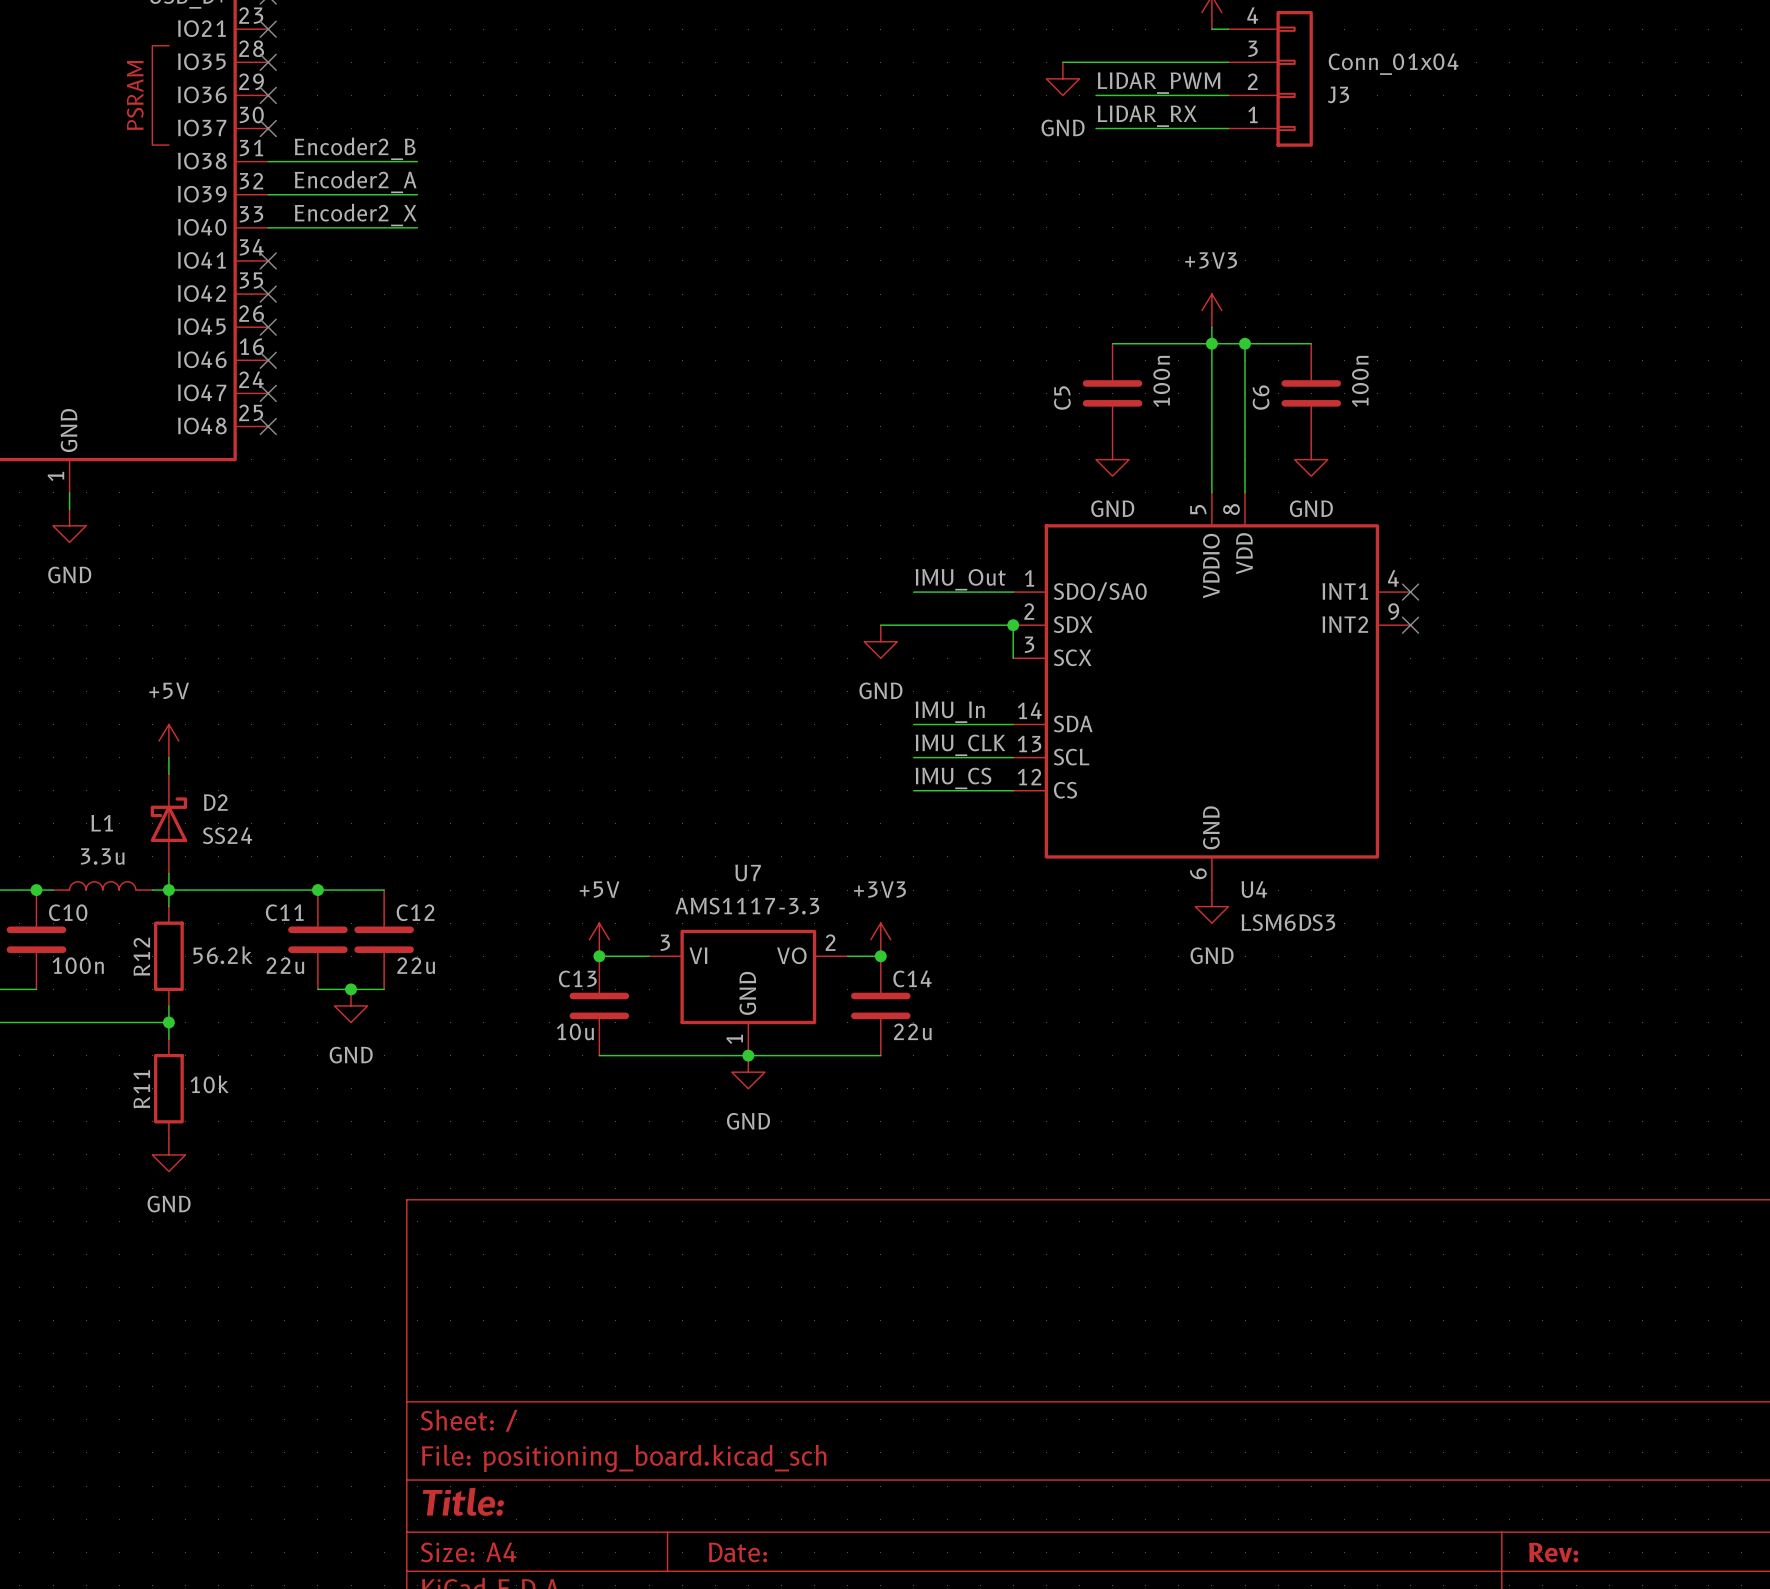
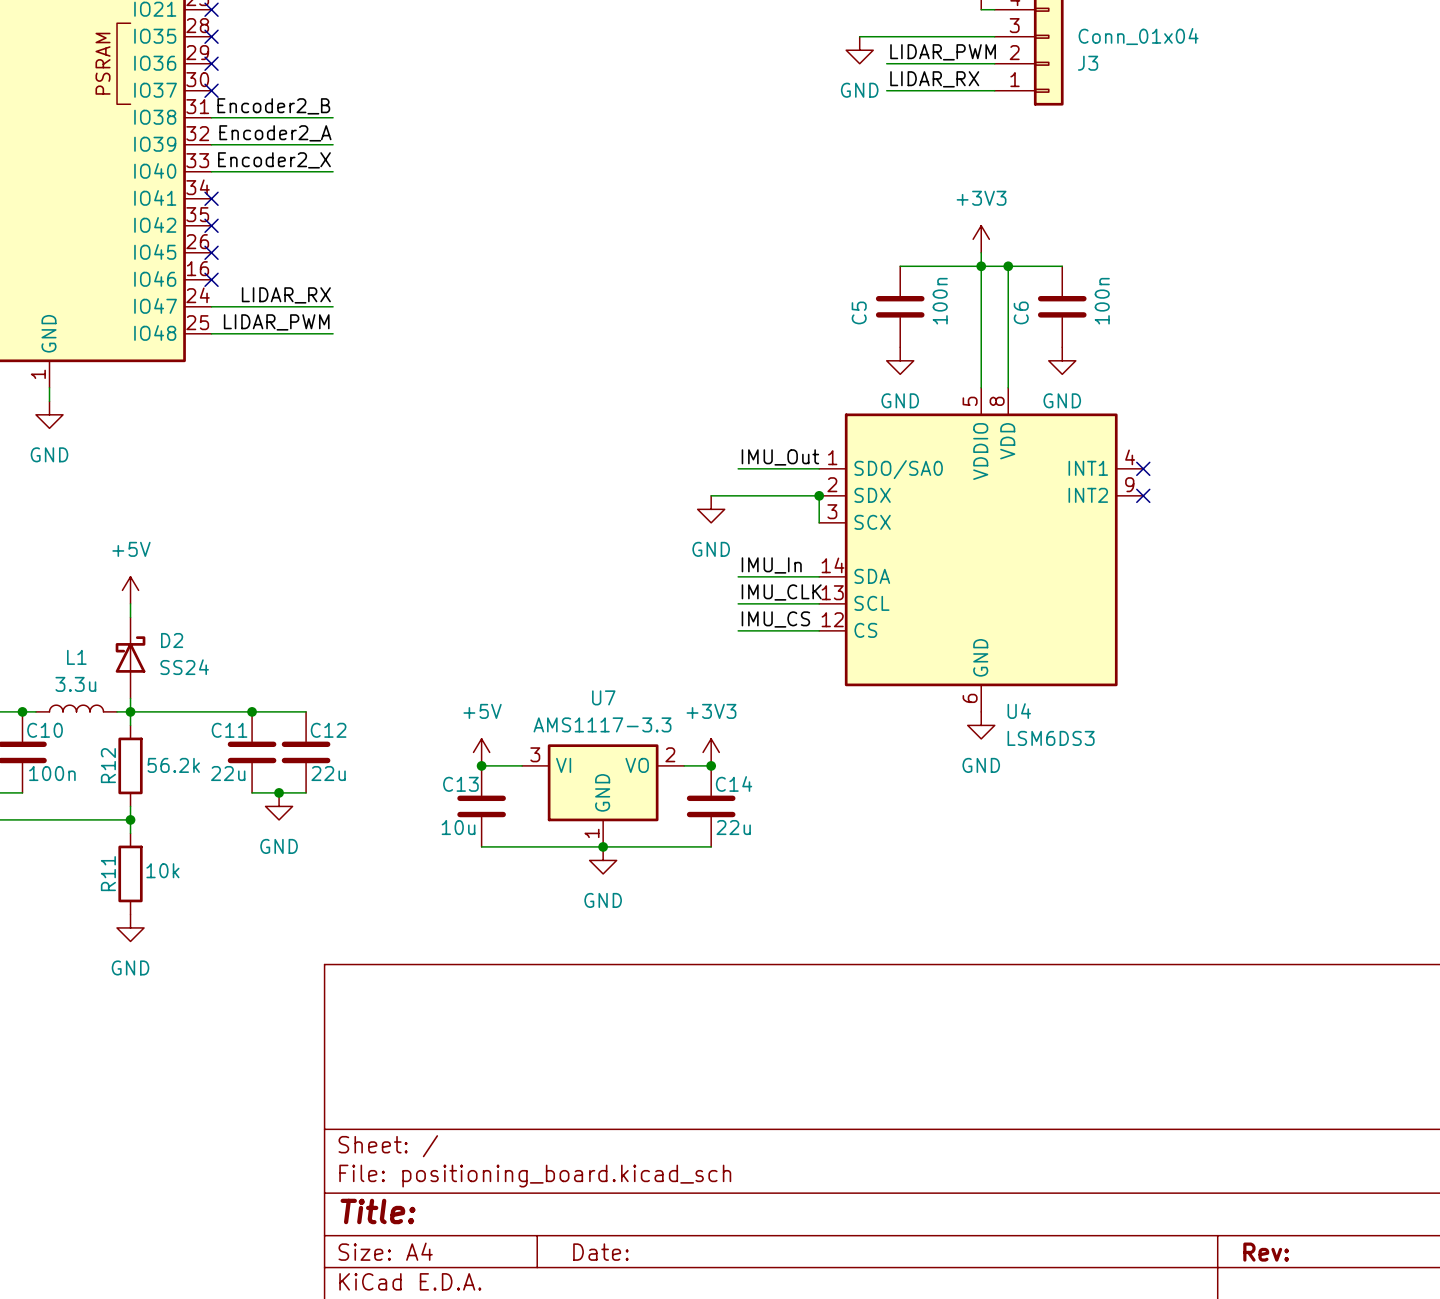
label: none -> LIDAR_RX (286, 295)
wire: none -> (211, 306) (333, 306)
no-connect mark: (268, 393) -> none
label: none -> LIDAR_PWM (276, 322)
wire: none -> (211, 333) (333, 333)
no-connect mark: (268, 426) -> none

